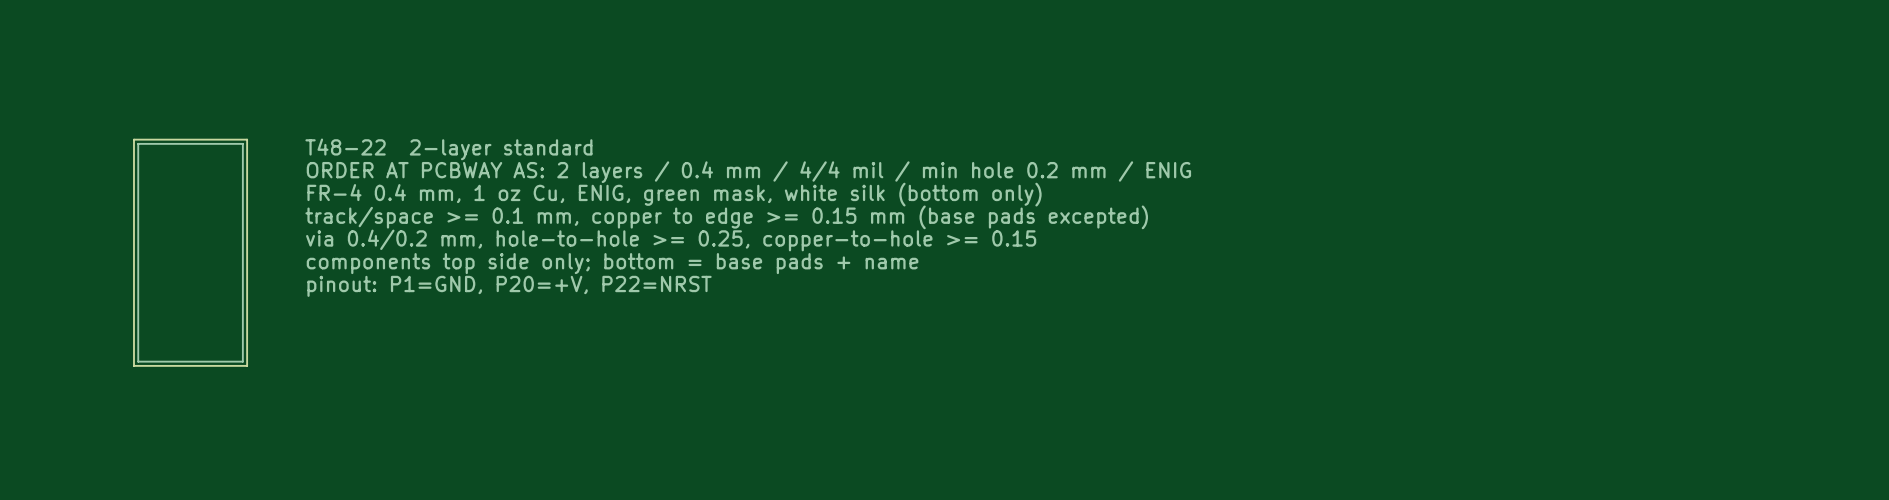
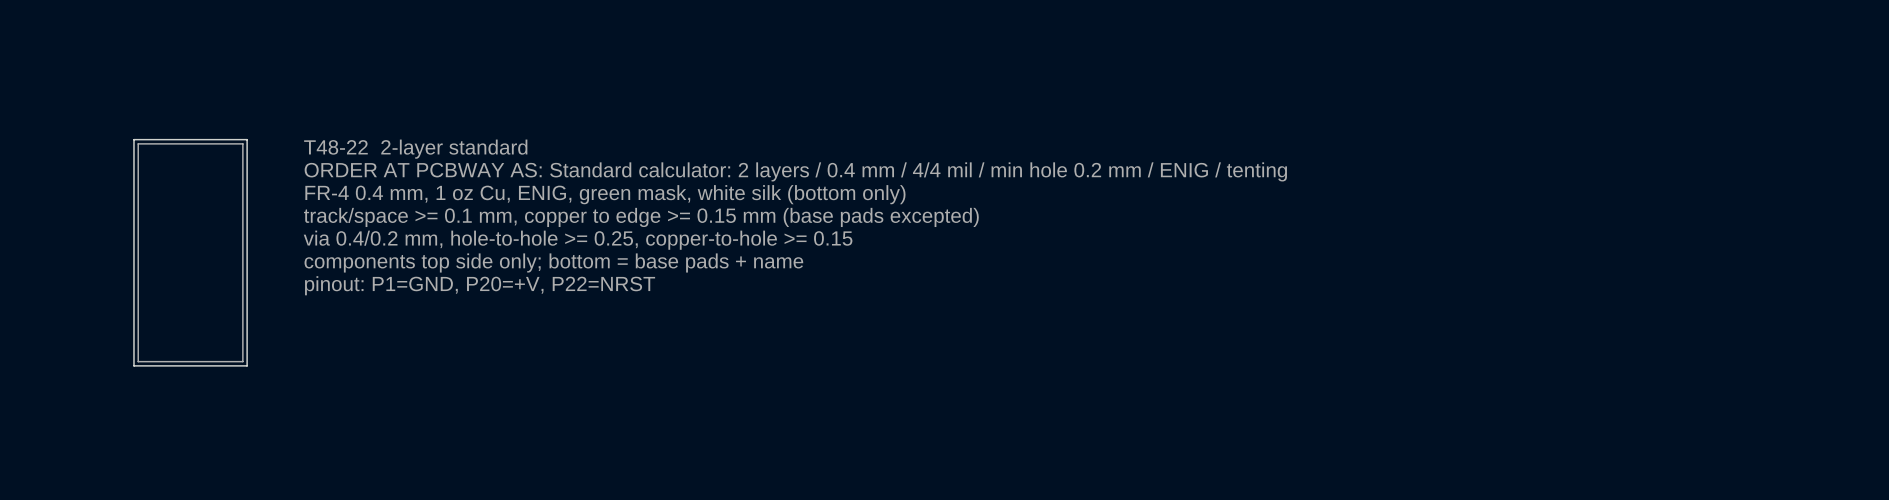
text: ORDER AT PCBWAY AS: 2 layers / 0.4 mm / 4/4 mil / min hole 0.2 mm / ENIG (748, 172) -> ORDER AT PCBWAY AS: Standard calculator: 2 layers / 0.4 mm / 4/4 mil / min hole 0.2 mm / ENIG / tenting (795, 171)

